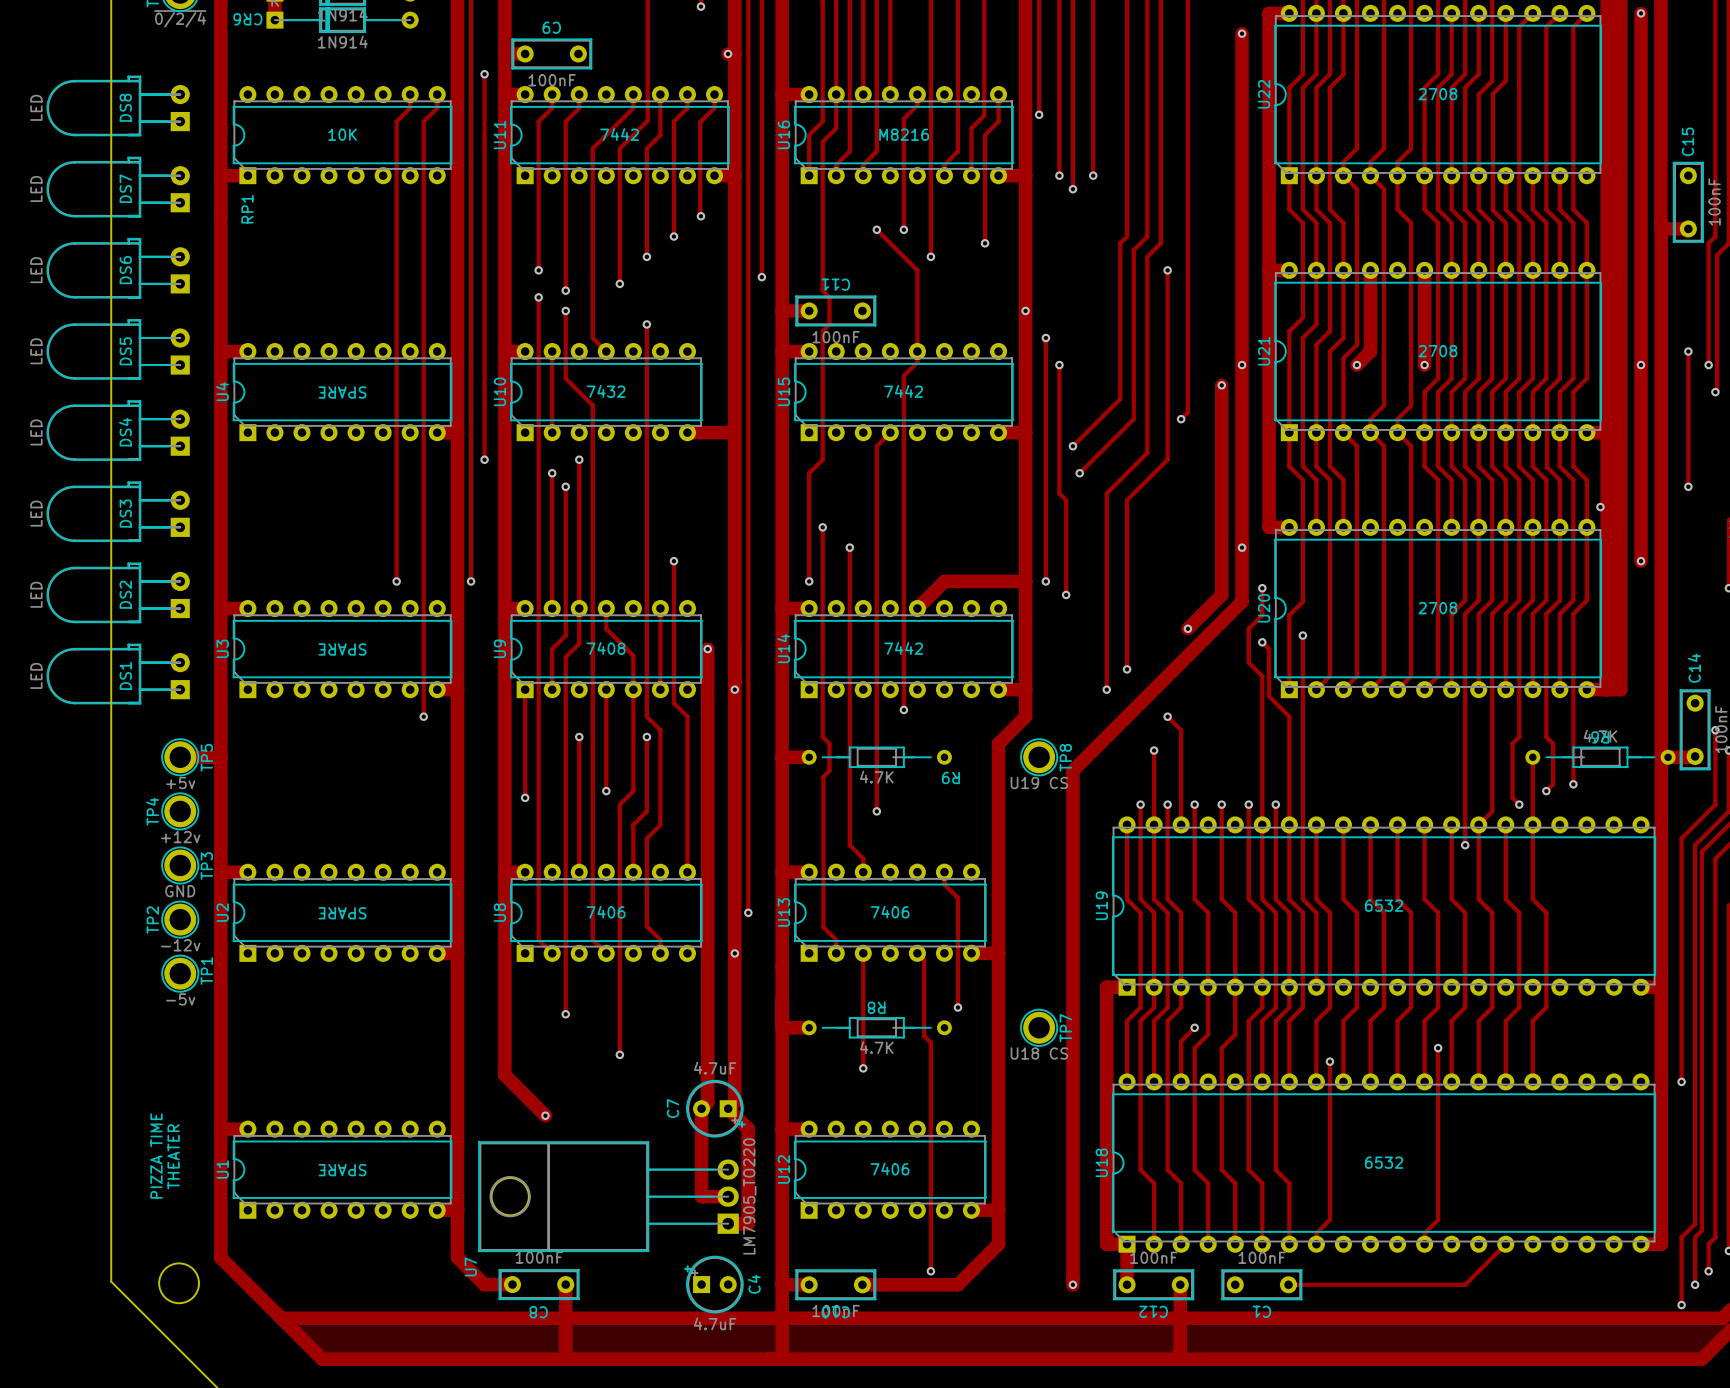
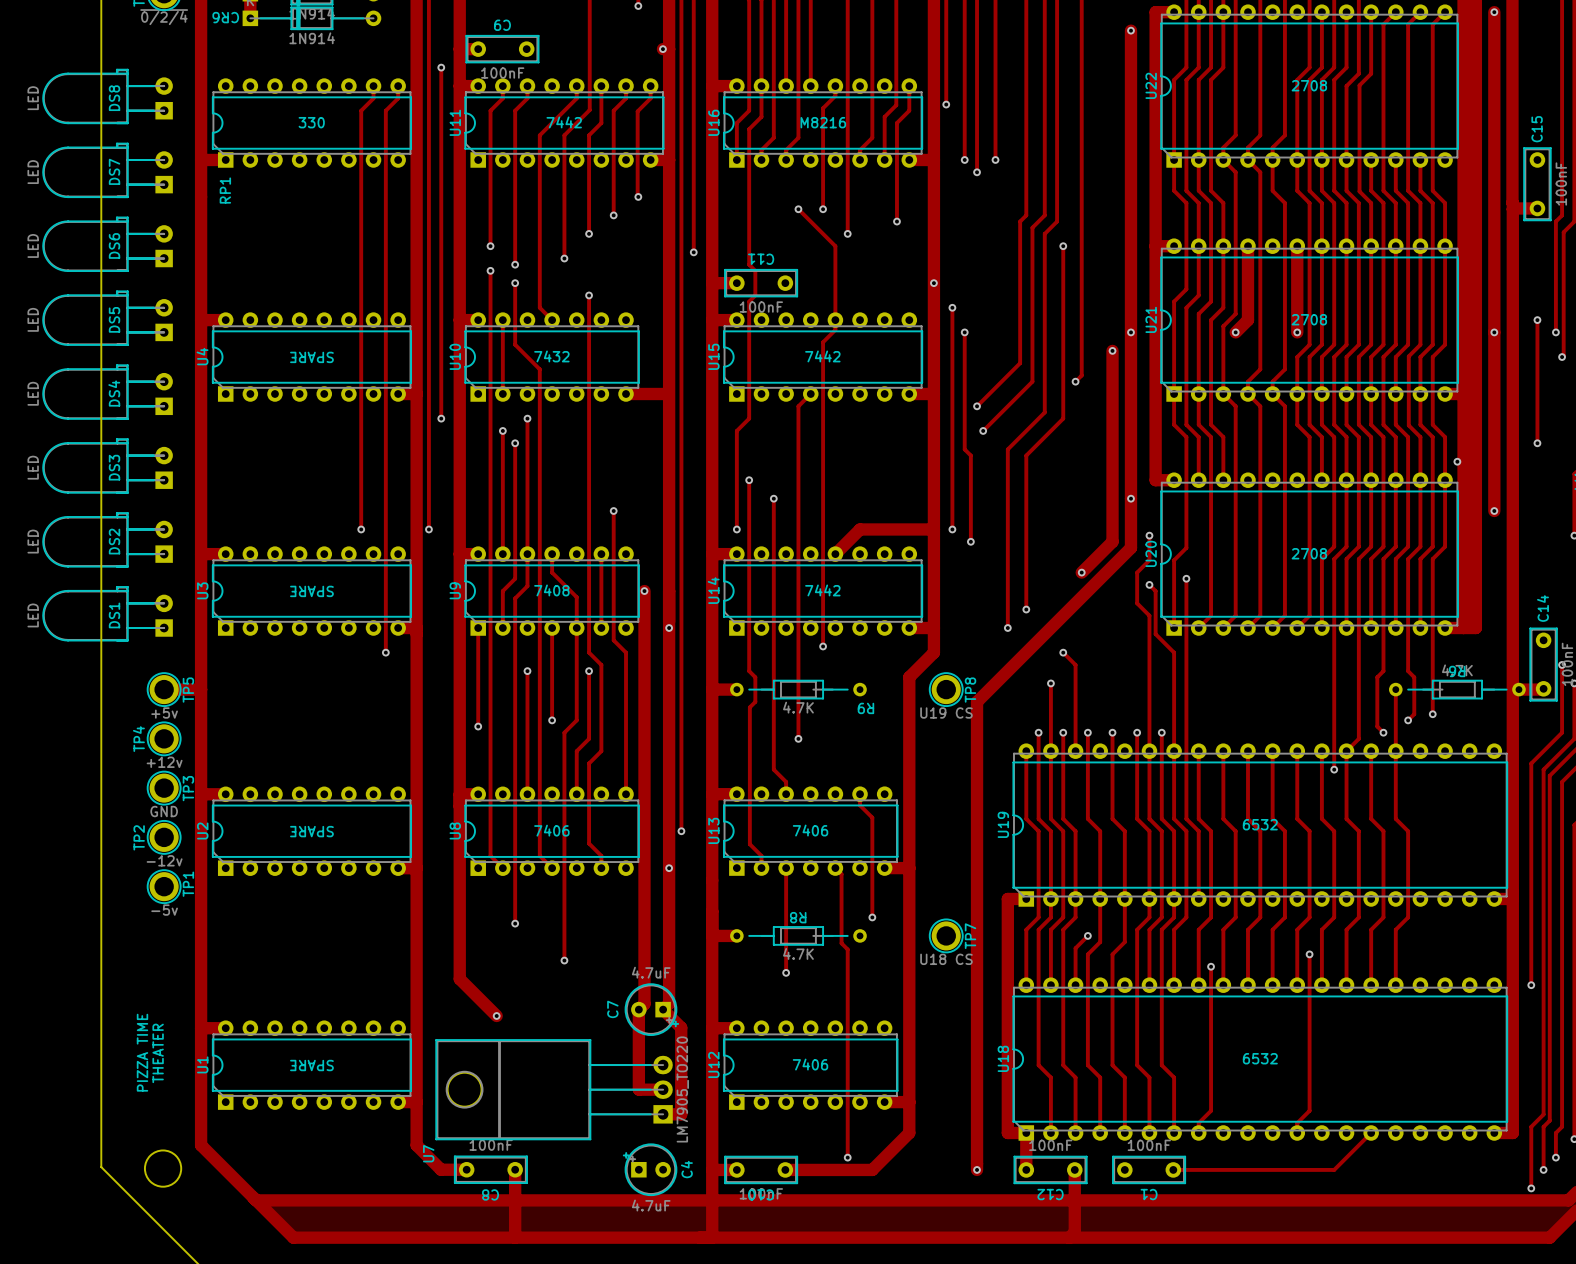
RP1 value: 10K (342, 134) -> 330 (311, 122)

